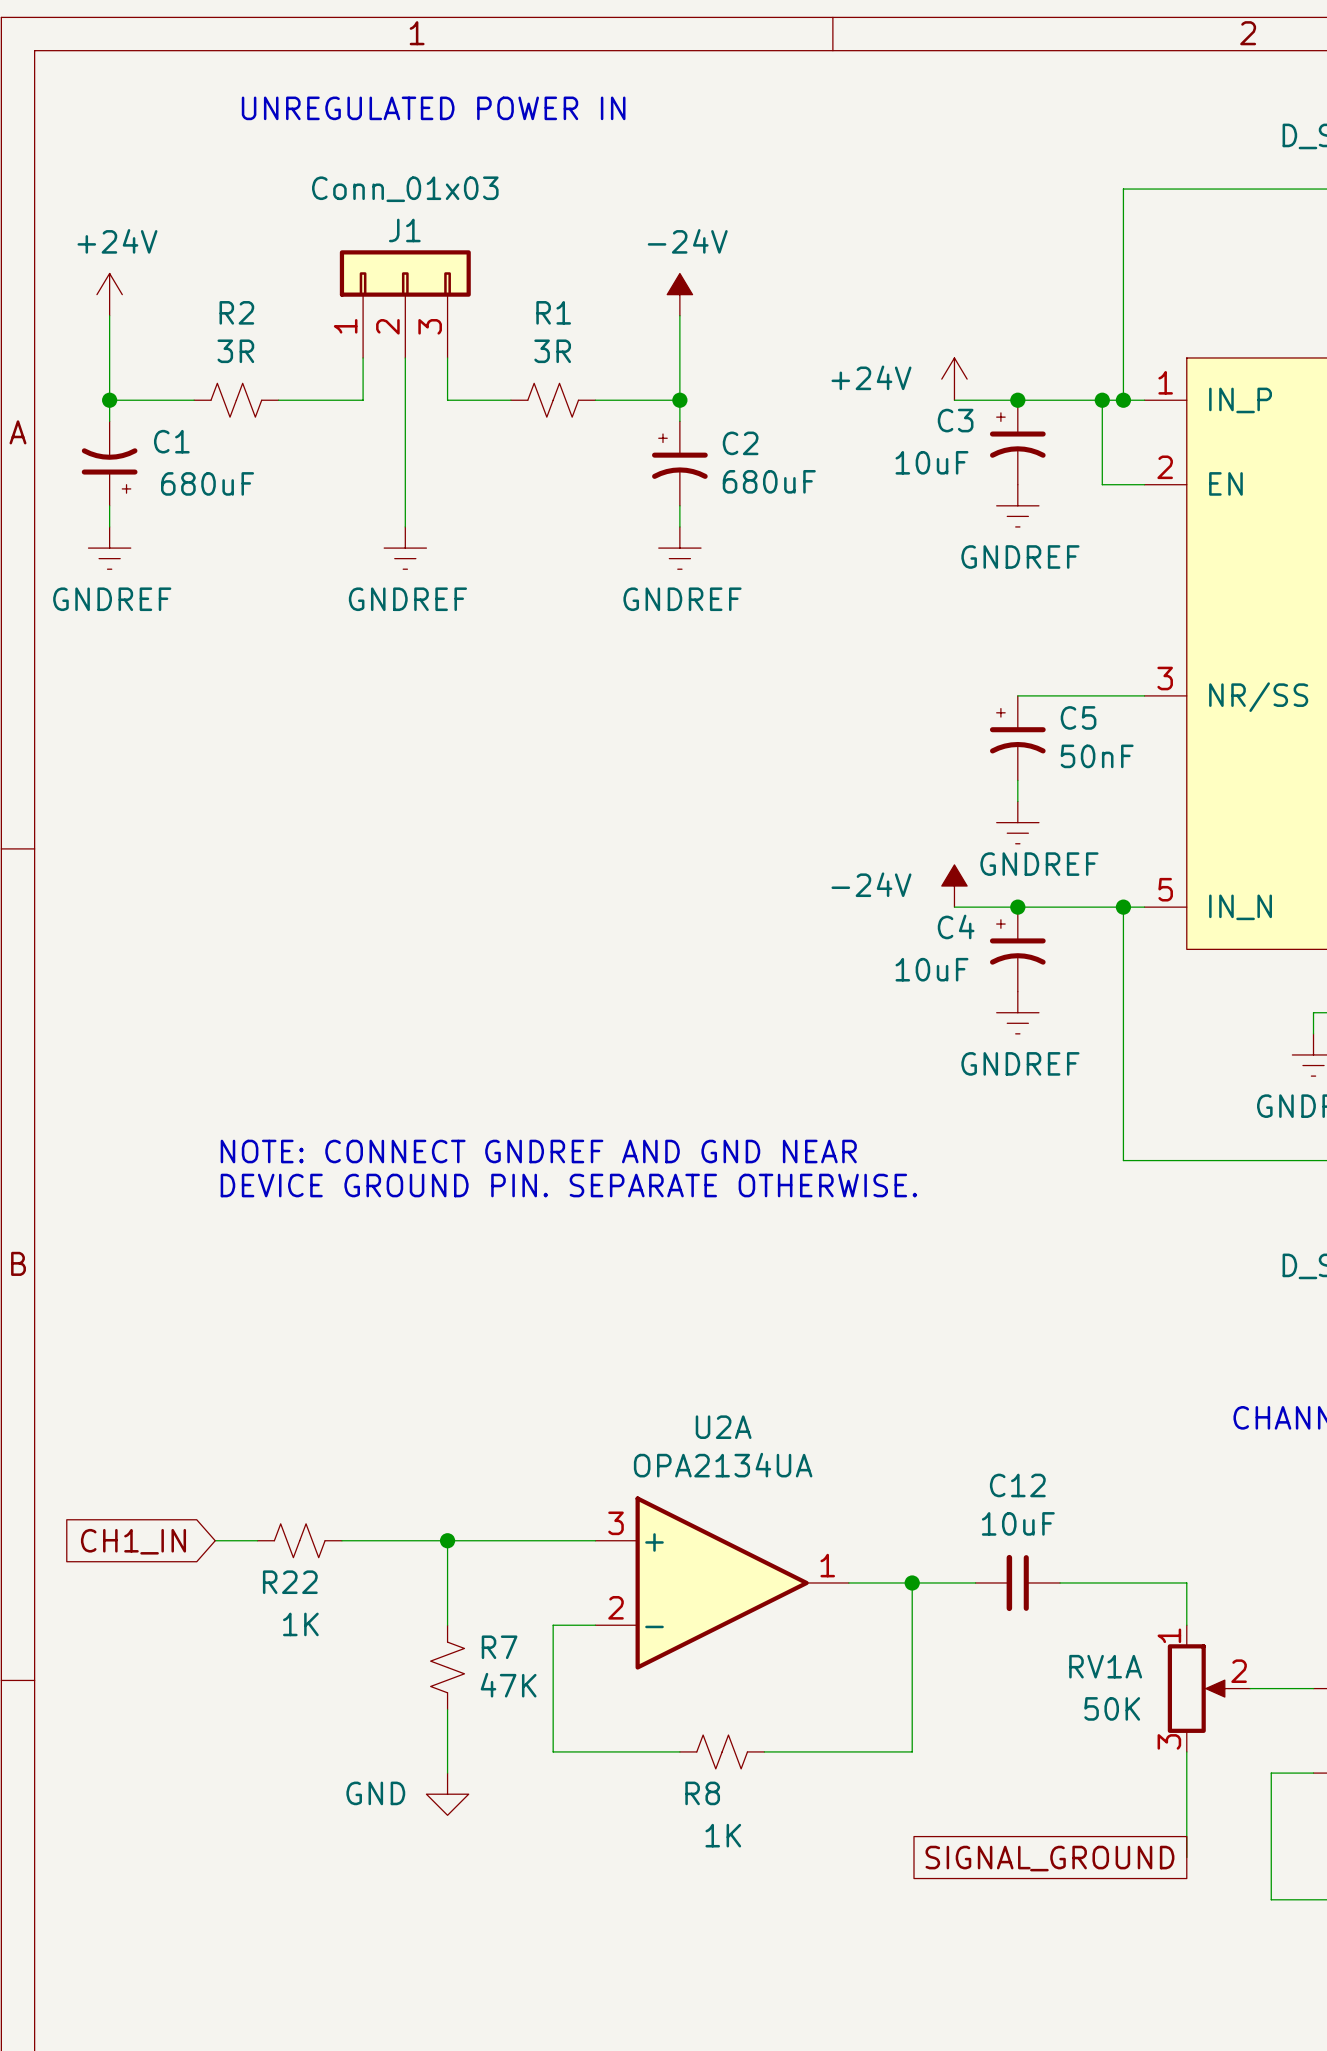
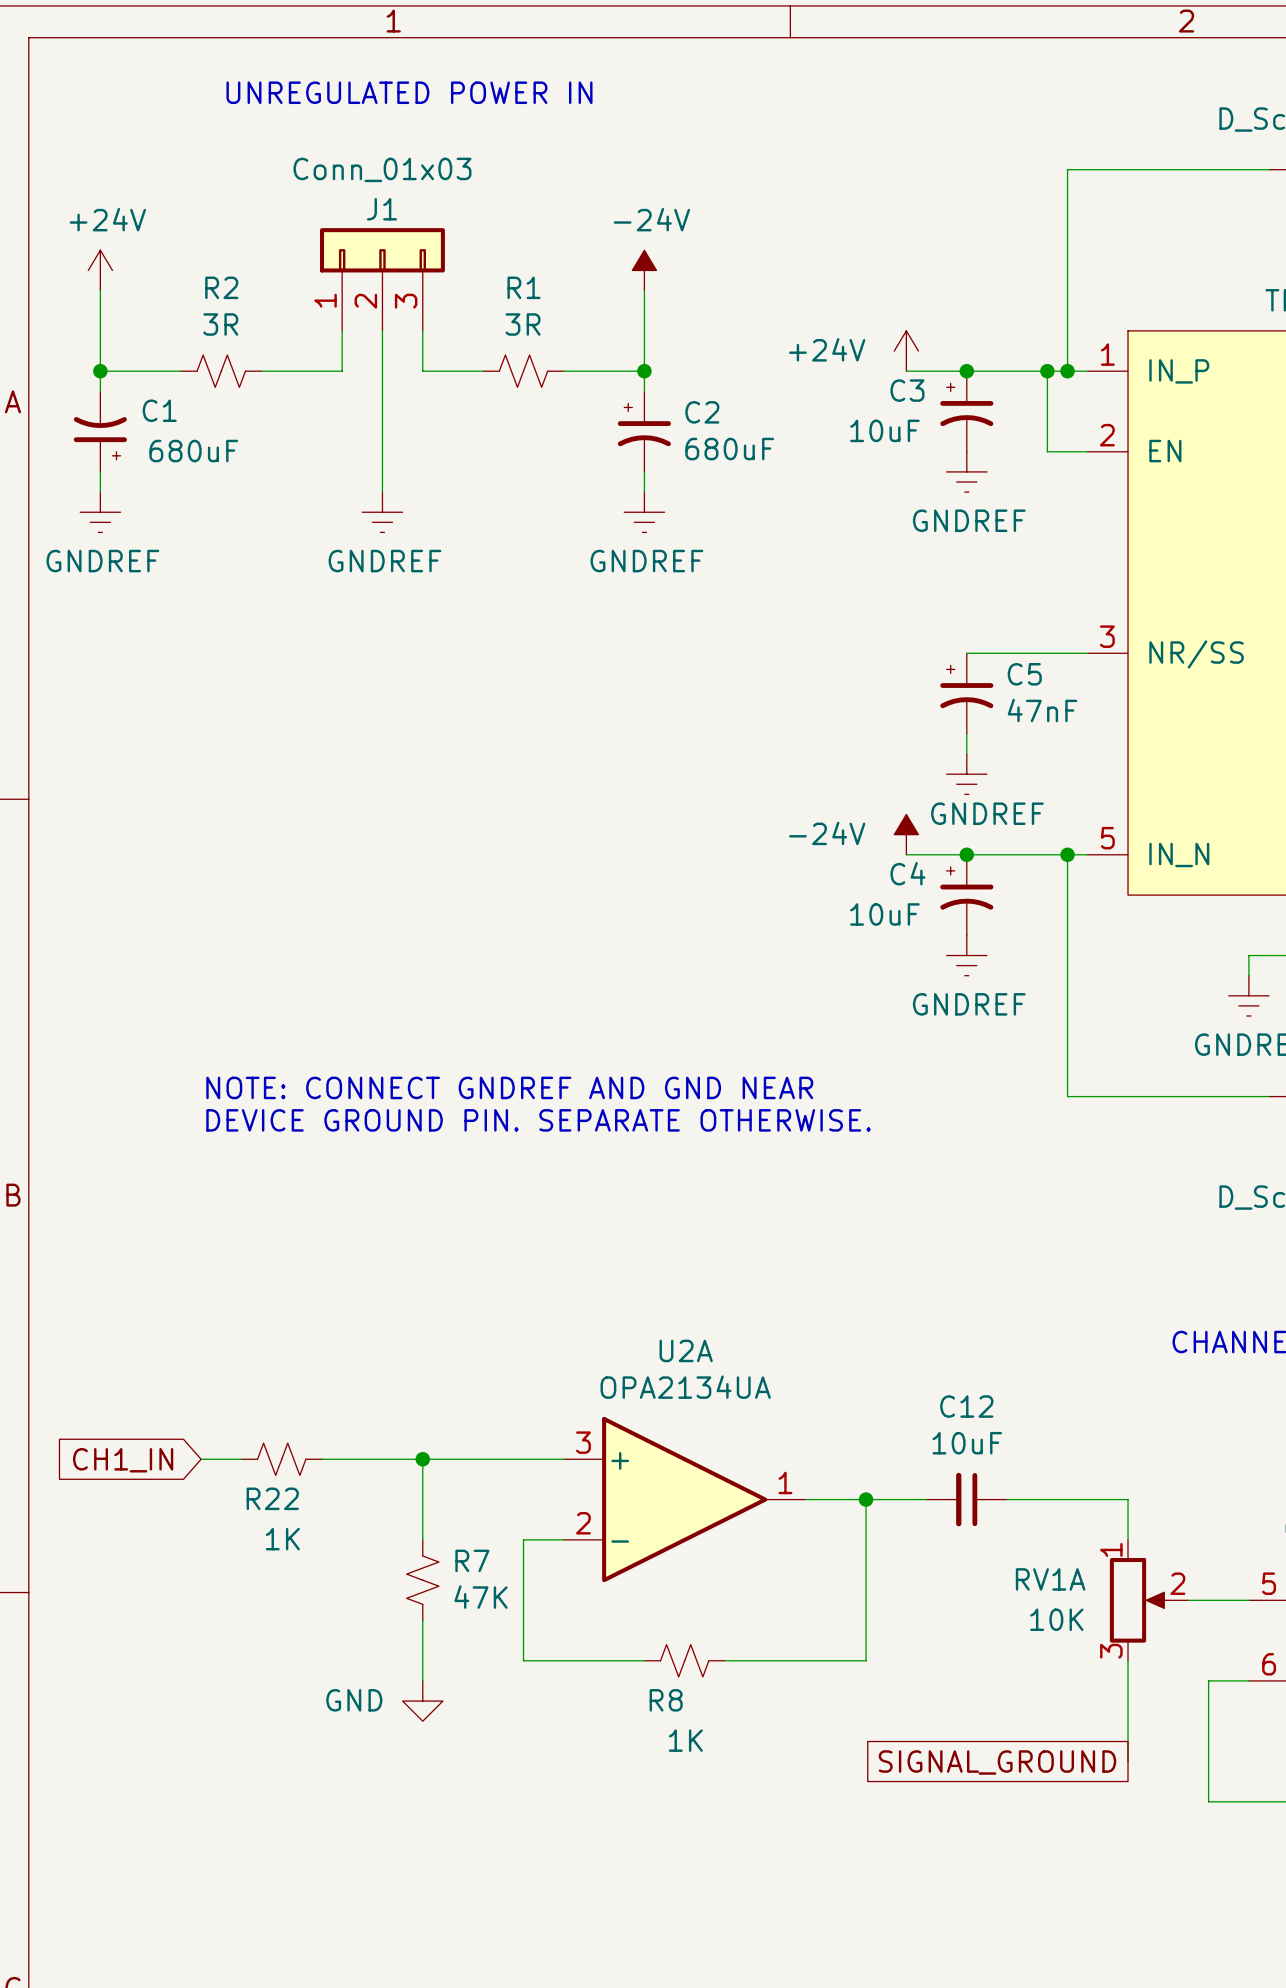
C5 value: 50nF (1097, 756) -> 47nF (1042, 710)
RV1A value: 50K (1112, 1708) -> 10K (1056, 1619)

